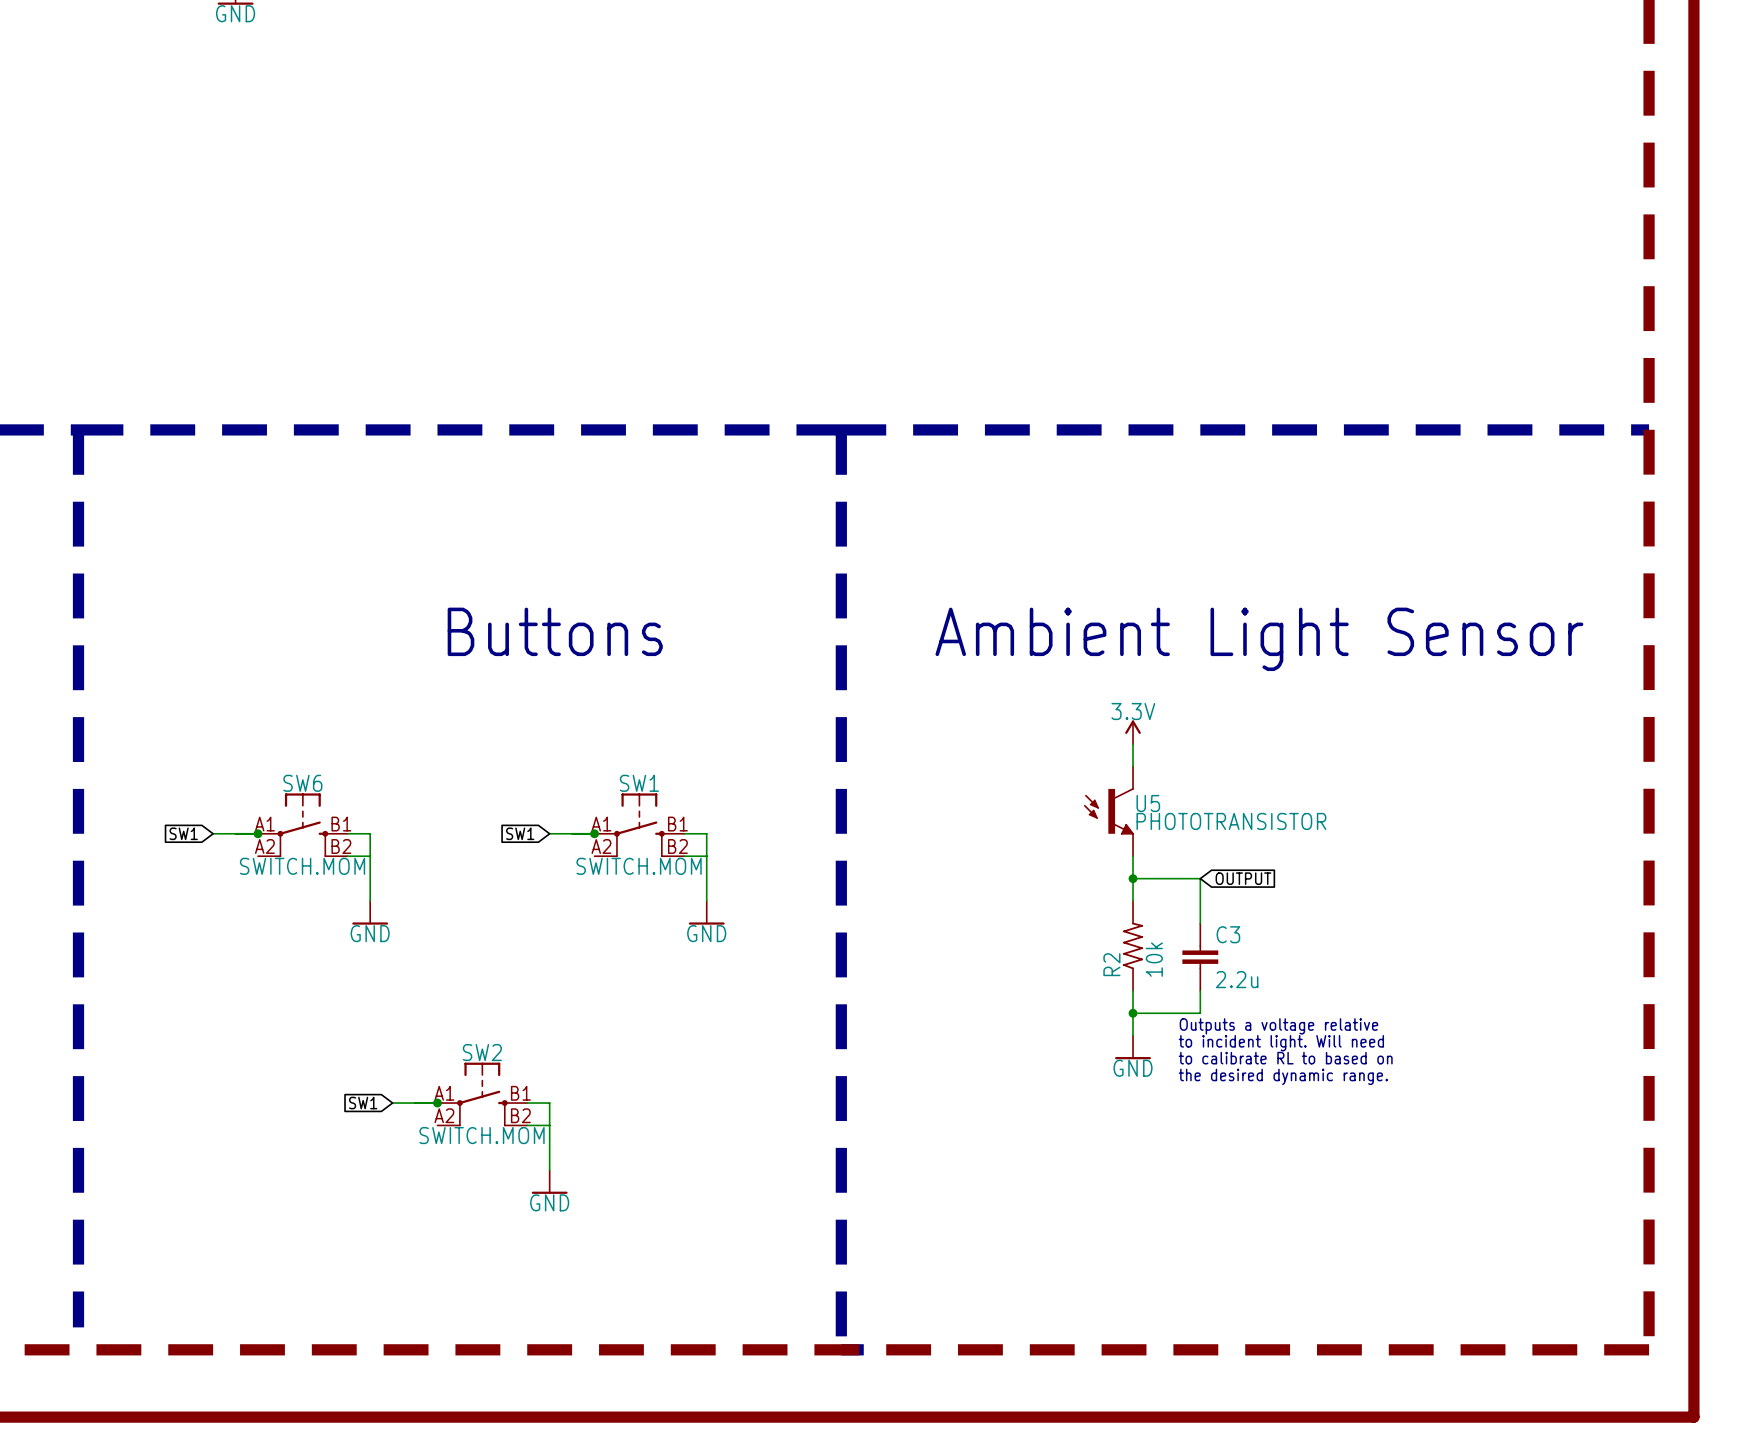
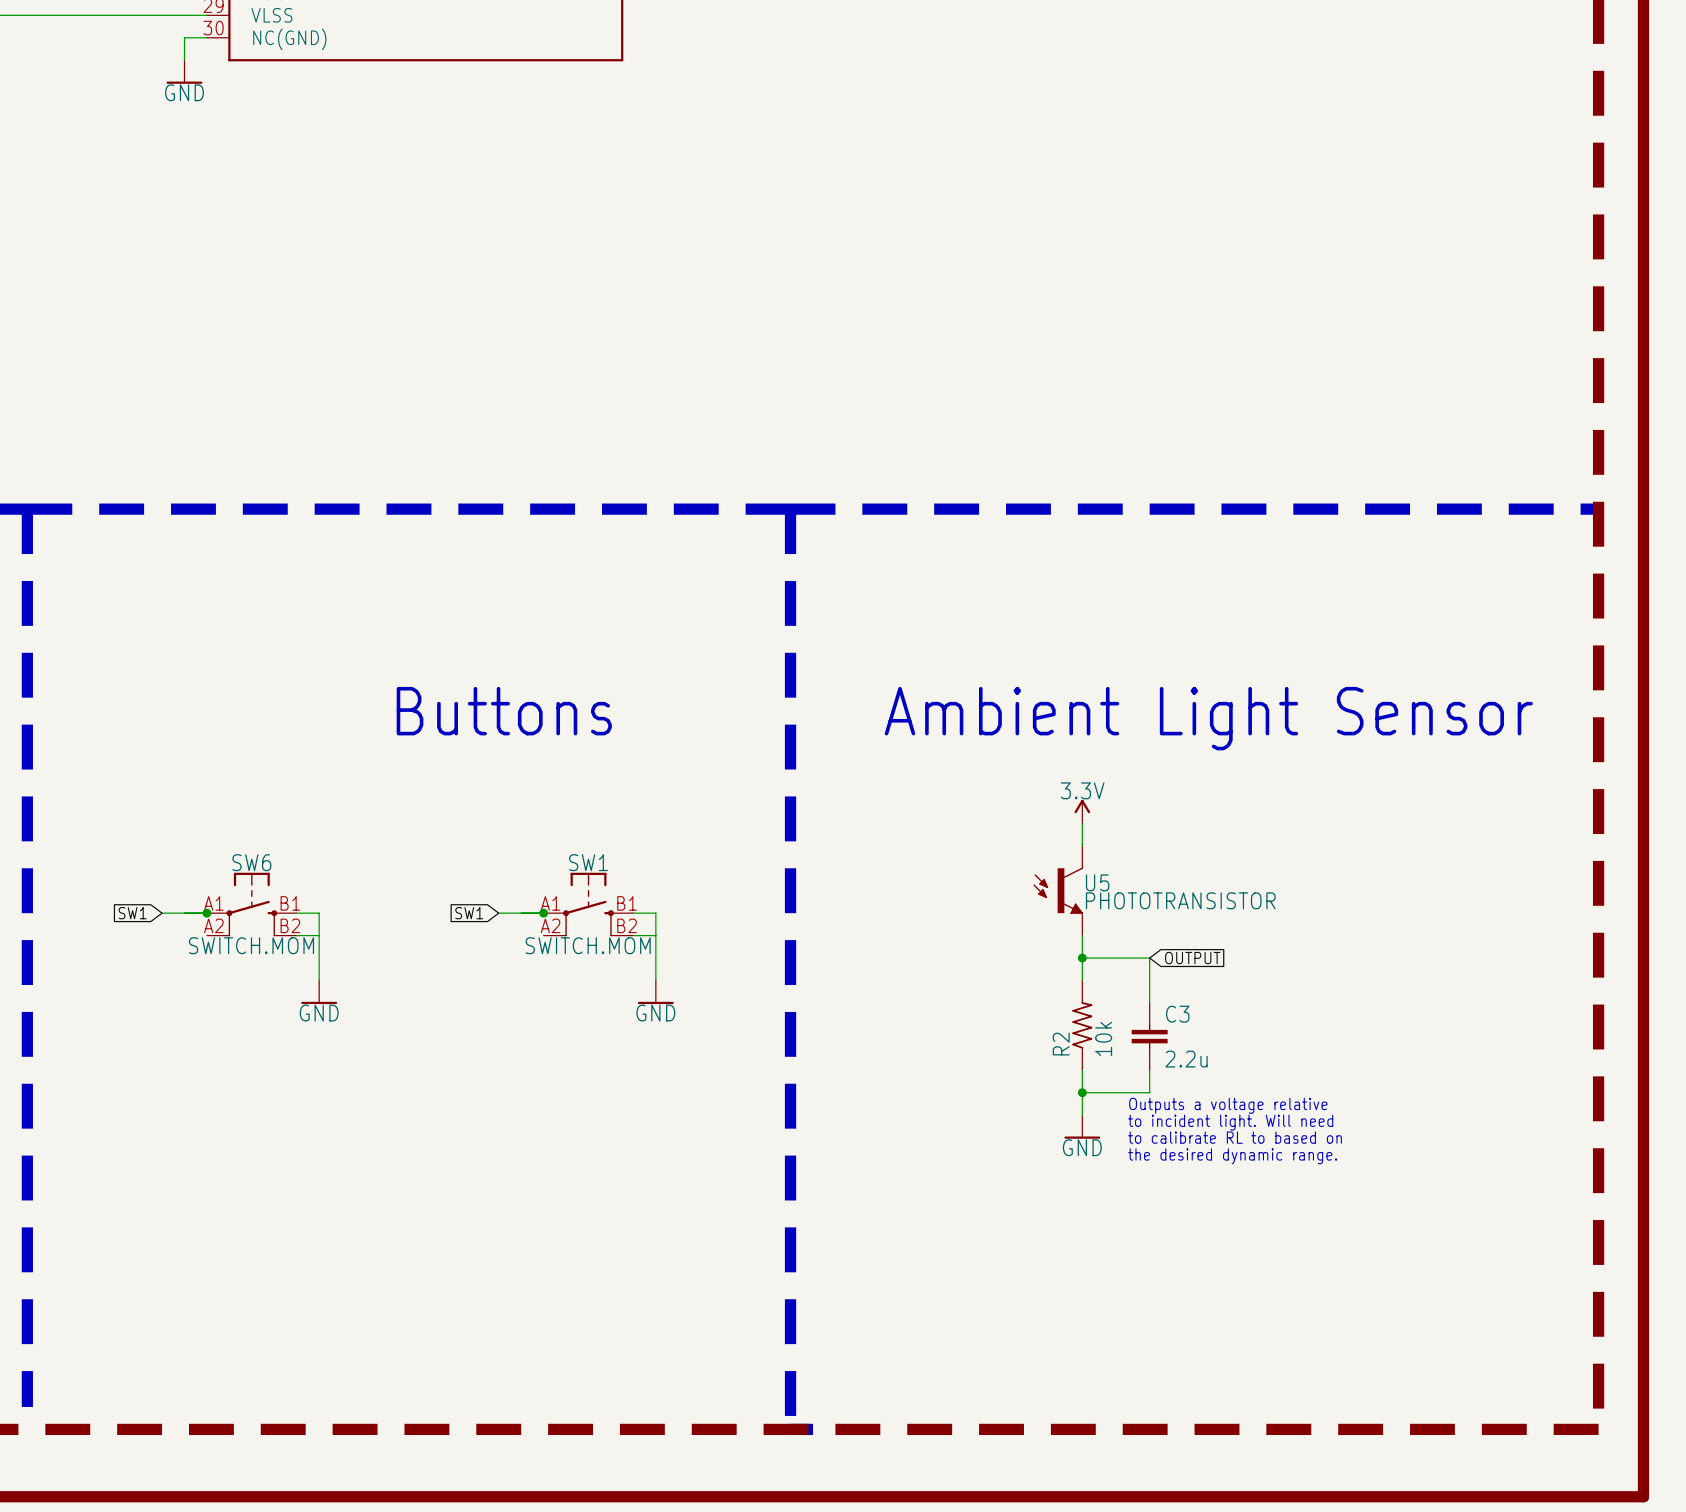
SW2: SWITCH.MOM (482, 1094) -> none
global label: SW1 (363, 1103) -> none
wire: (392, 1103) (437, 1103) -> none
junction: (437, 1103) -> none
wire: (527, 1103) (549, 1103) (549, 1170) -> none
wire: (527, 1125) (549, 1125) -> none
power symbol: GND (549, 1182) -> none

